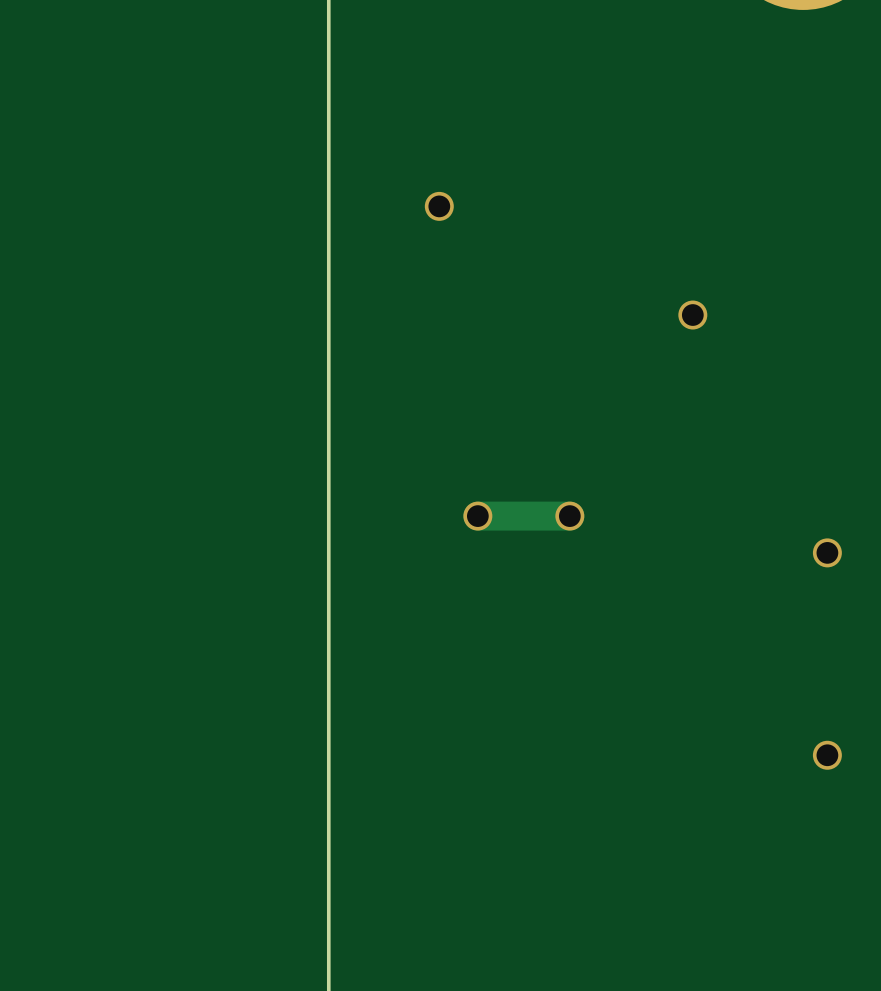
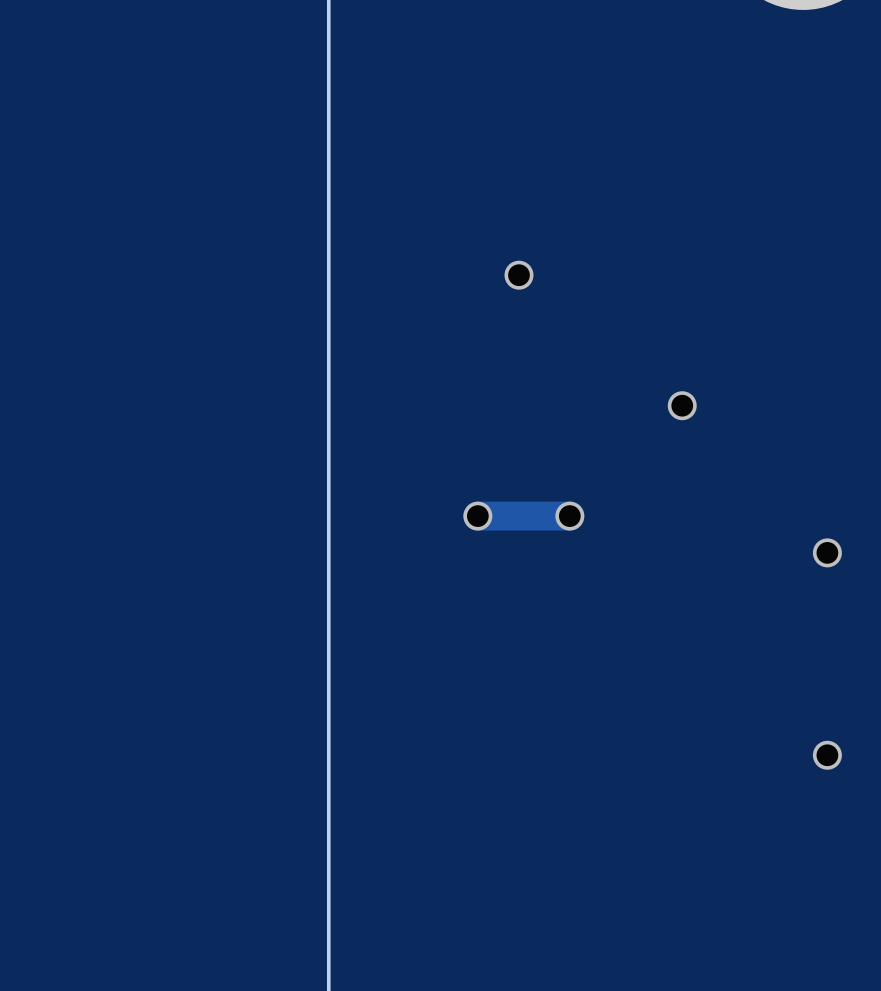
via: (439, 206) -> none
via: none -> (518, 275)
via: (692, 315) -> none
via: none -> (682, 405)

